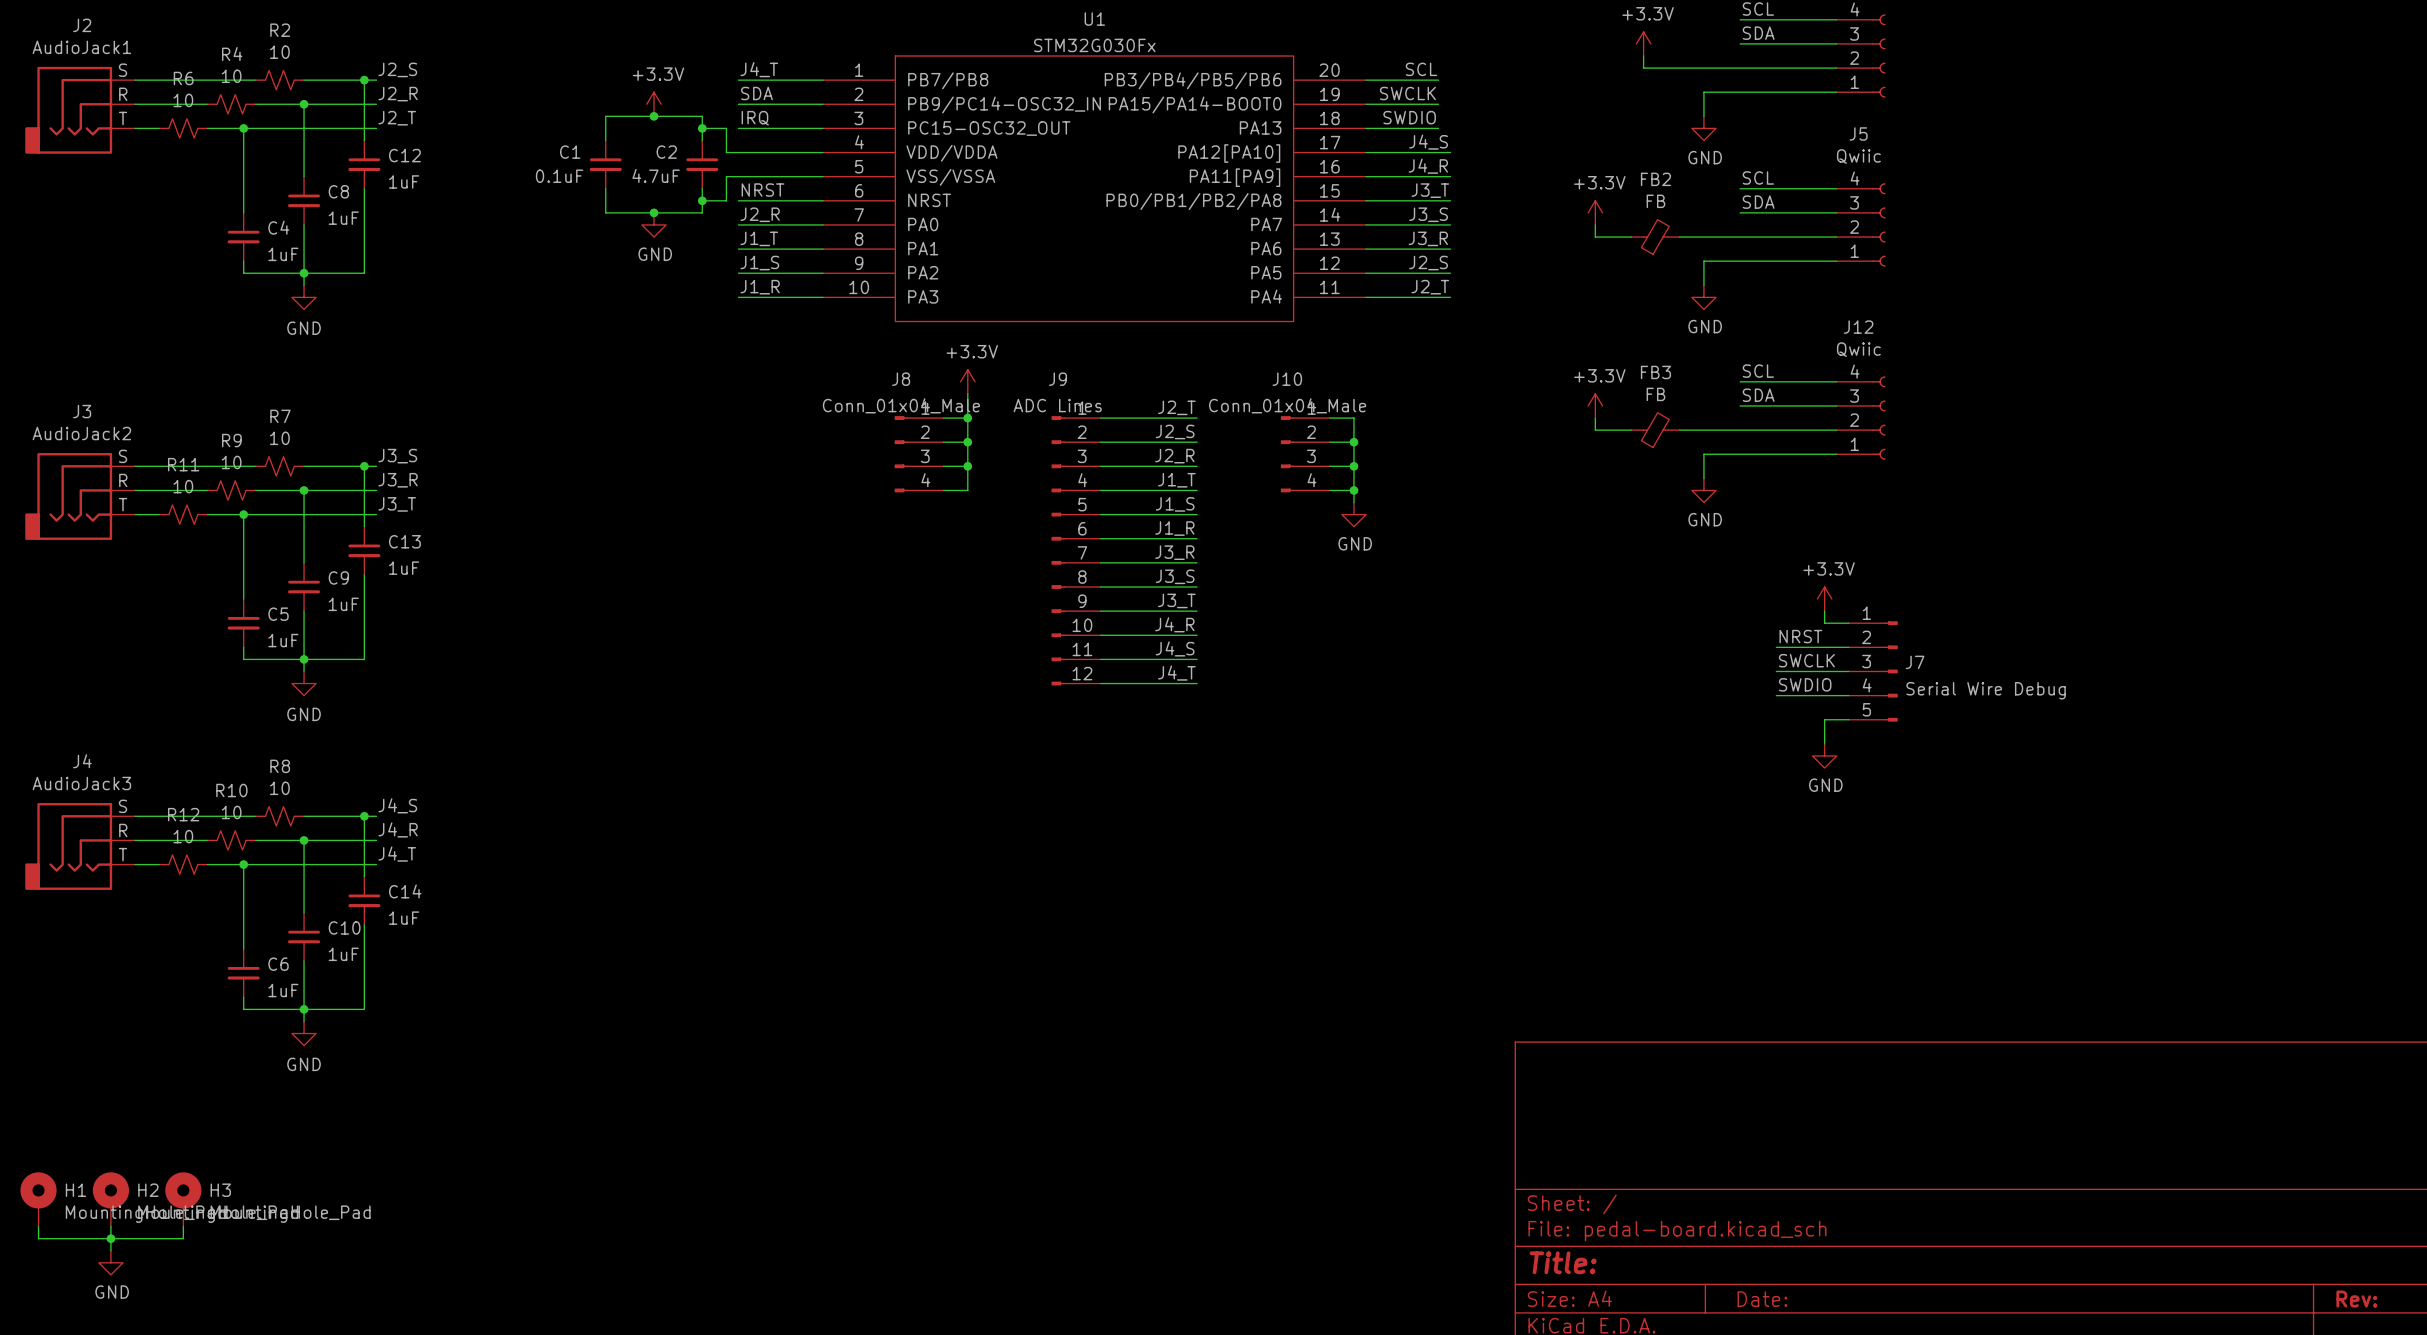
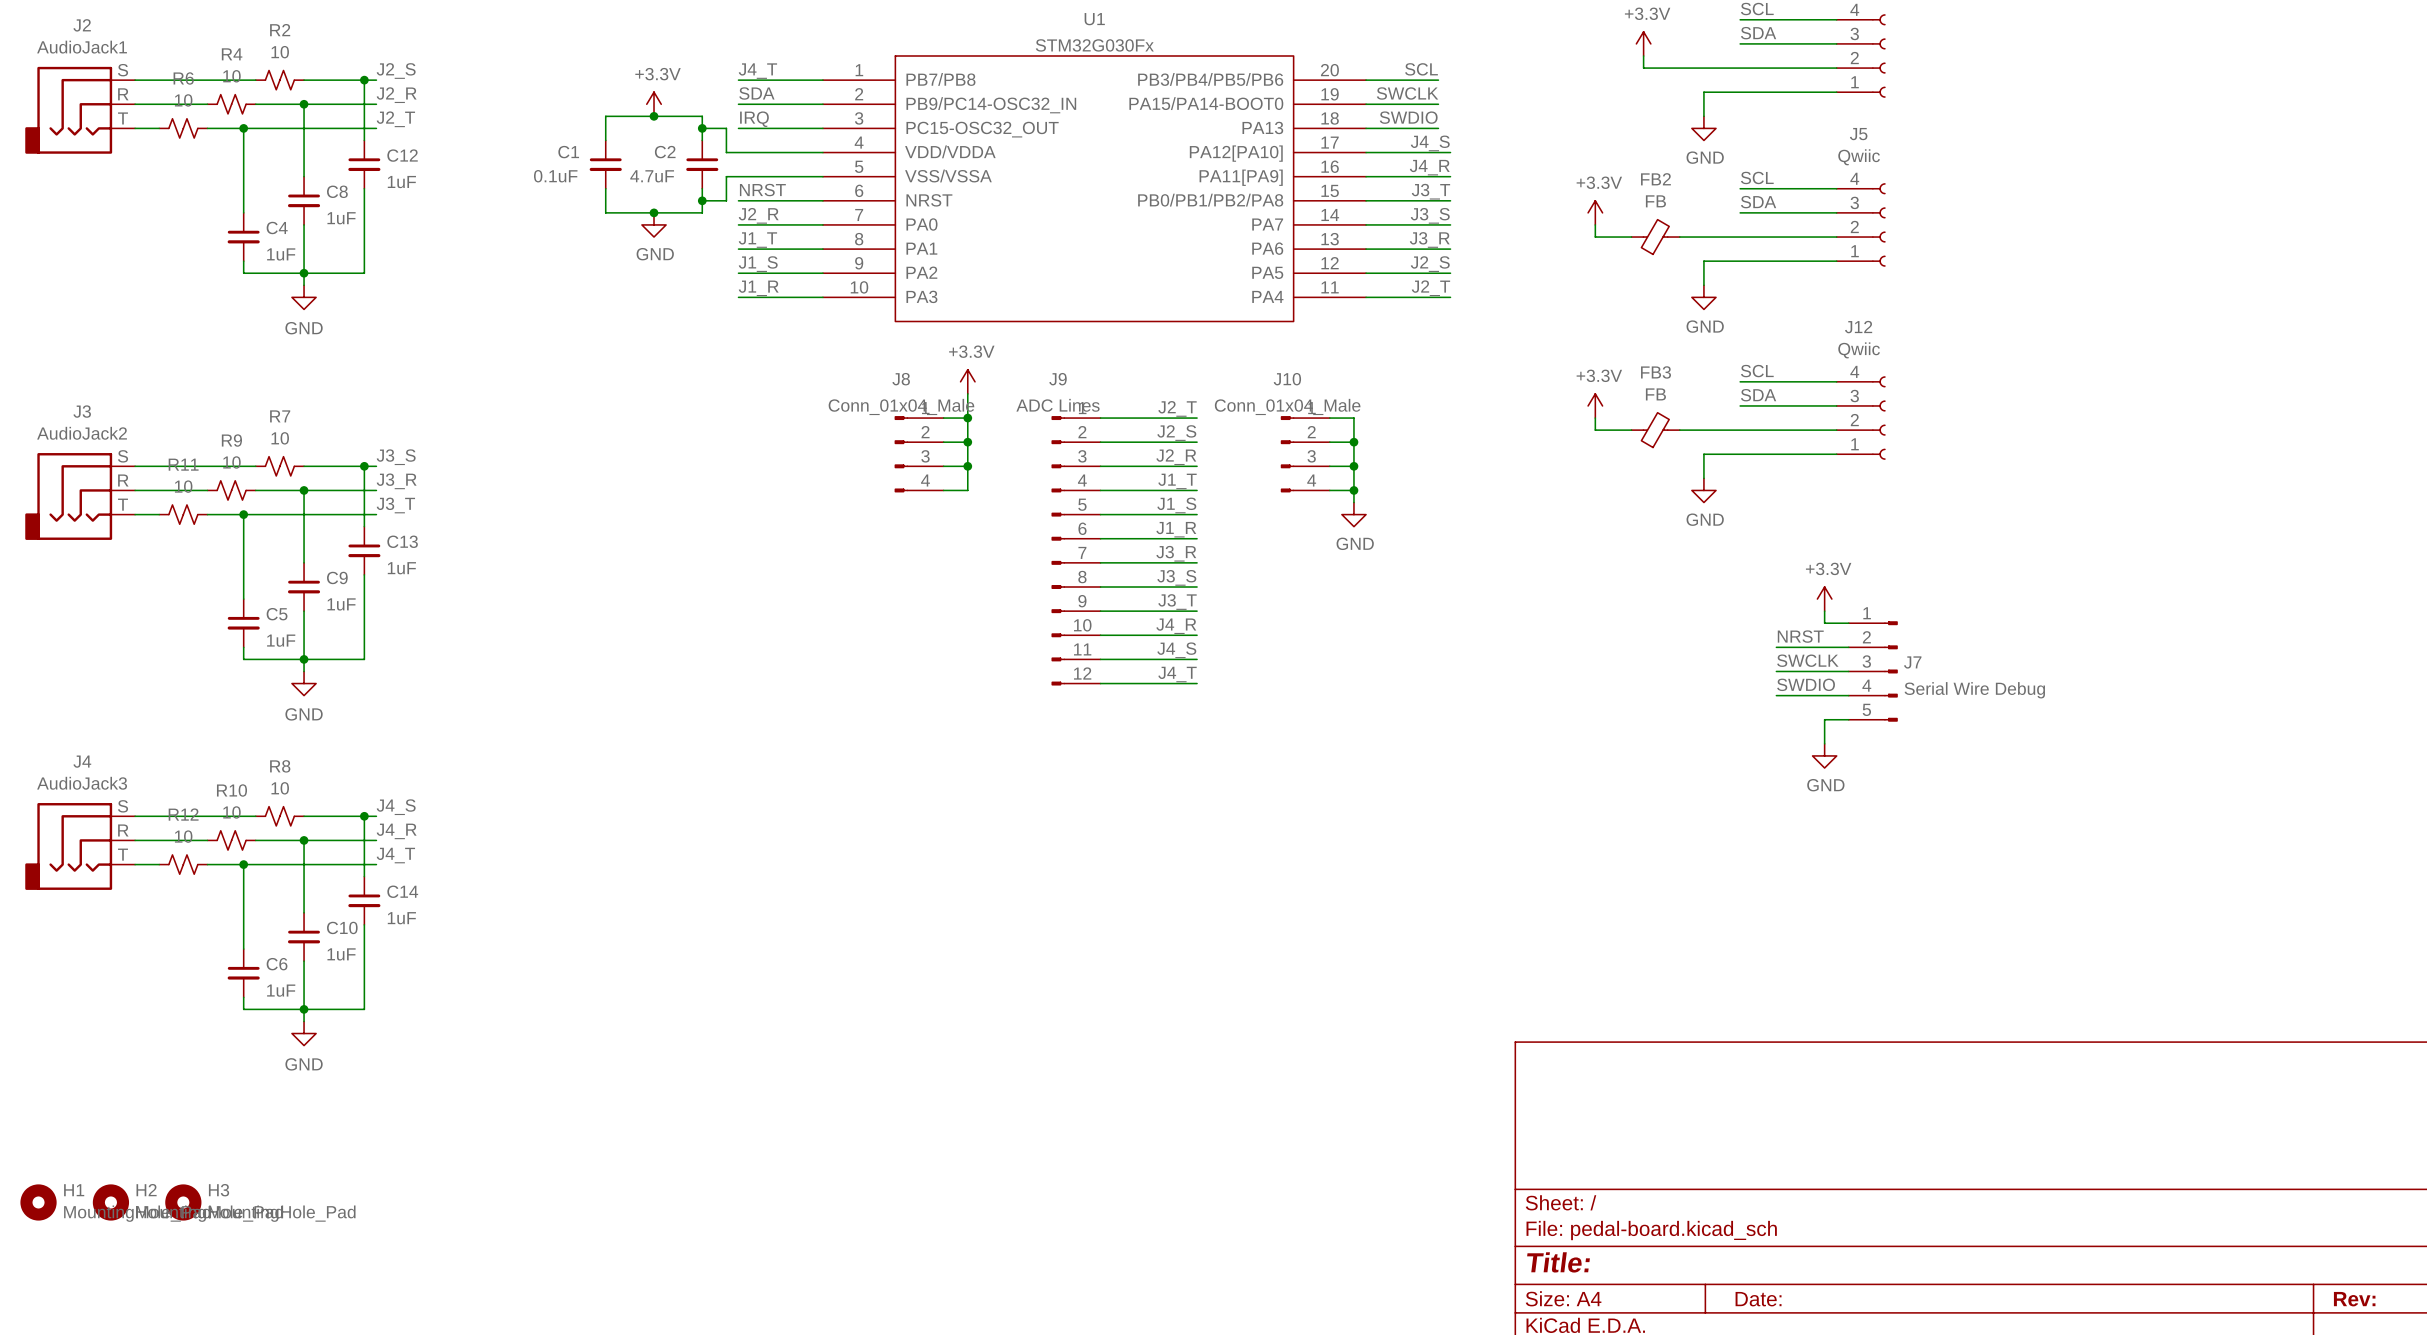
H1 symbol: [20, 1172, 57, 1227] -> [20, 1184, 57, 1221]
H2 symbol: [92, 1172, 130, 1227] -> [92, 1184, 130, 1221]
H3 symbol: [165, 1172, 202, 1227] -> [165, 1184, 202, 1221]
wire: (38, 1226) (38, 1238) (183, 1238) (183, 1226) -> none
wire: (110, 1226) (110, 1250) -> none
junction: (110, 1238) -> none
power symbol: GND (110, 1262) -> none

